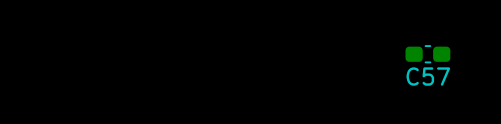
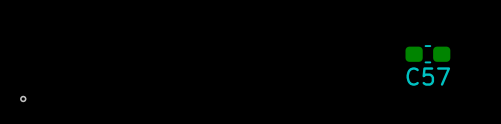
via: none -> (23, 98)

